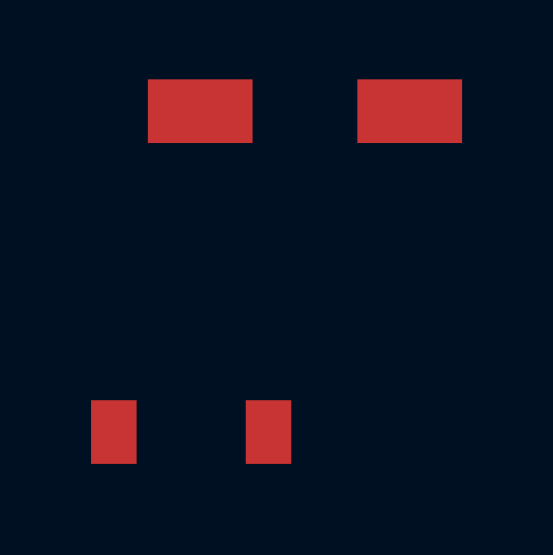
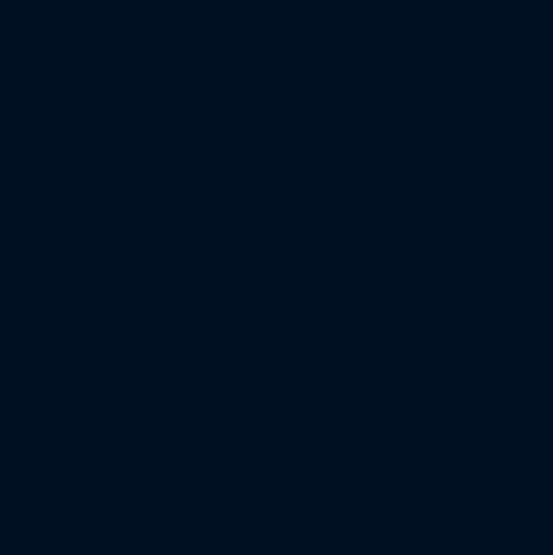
part: (304, 111) -> none
part: (191, 432) -> none

